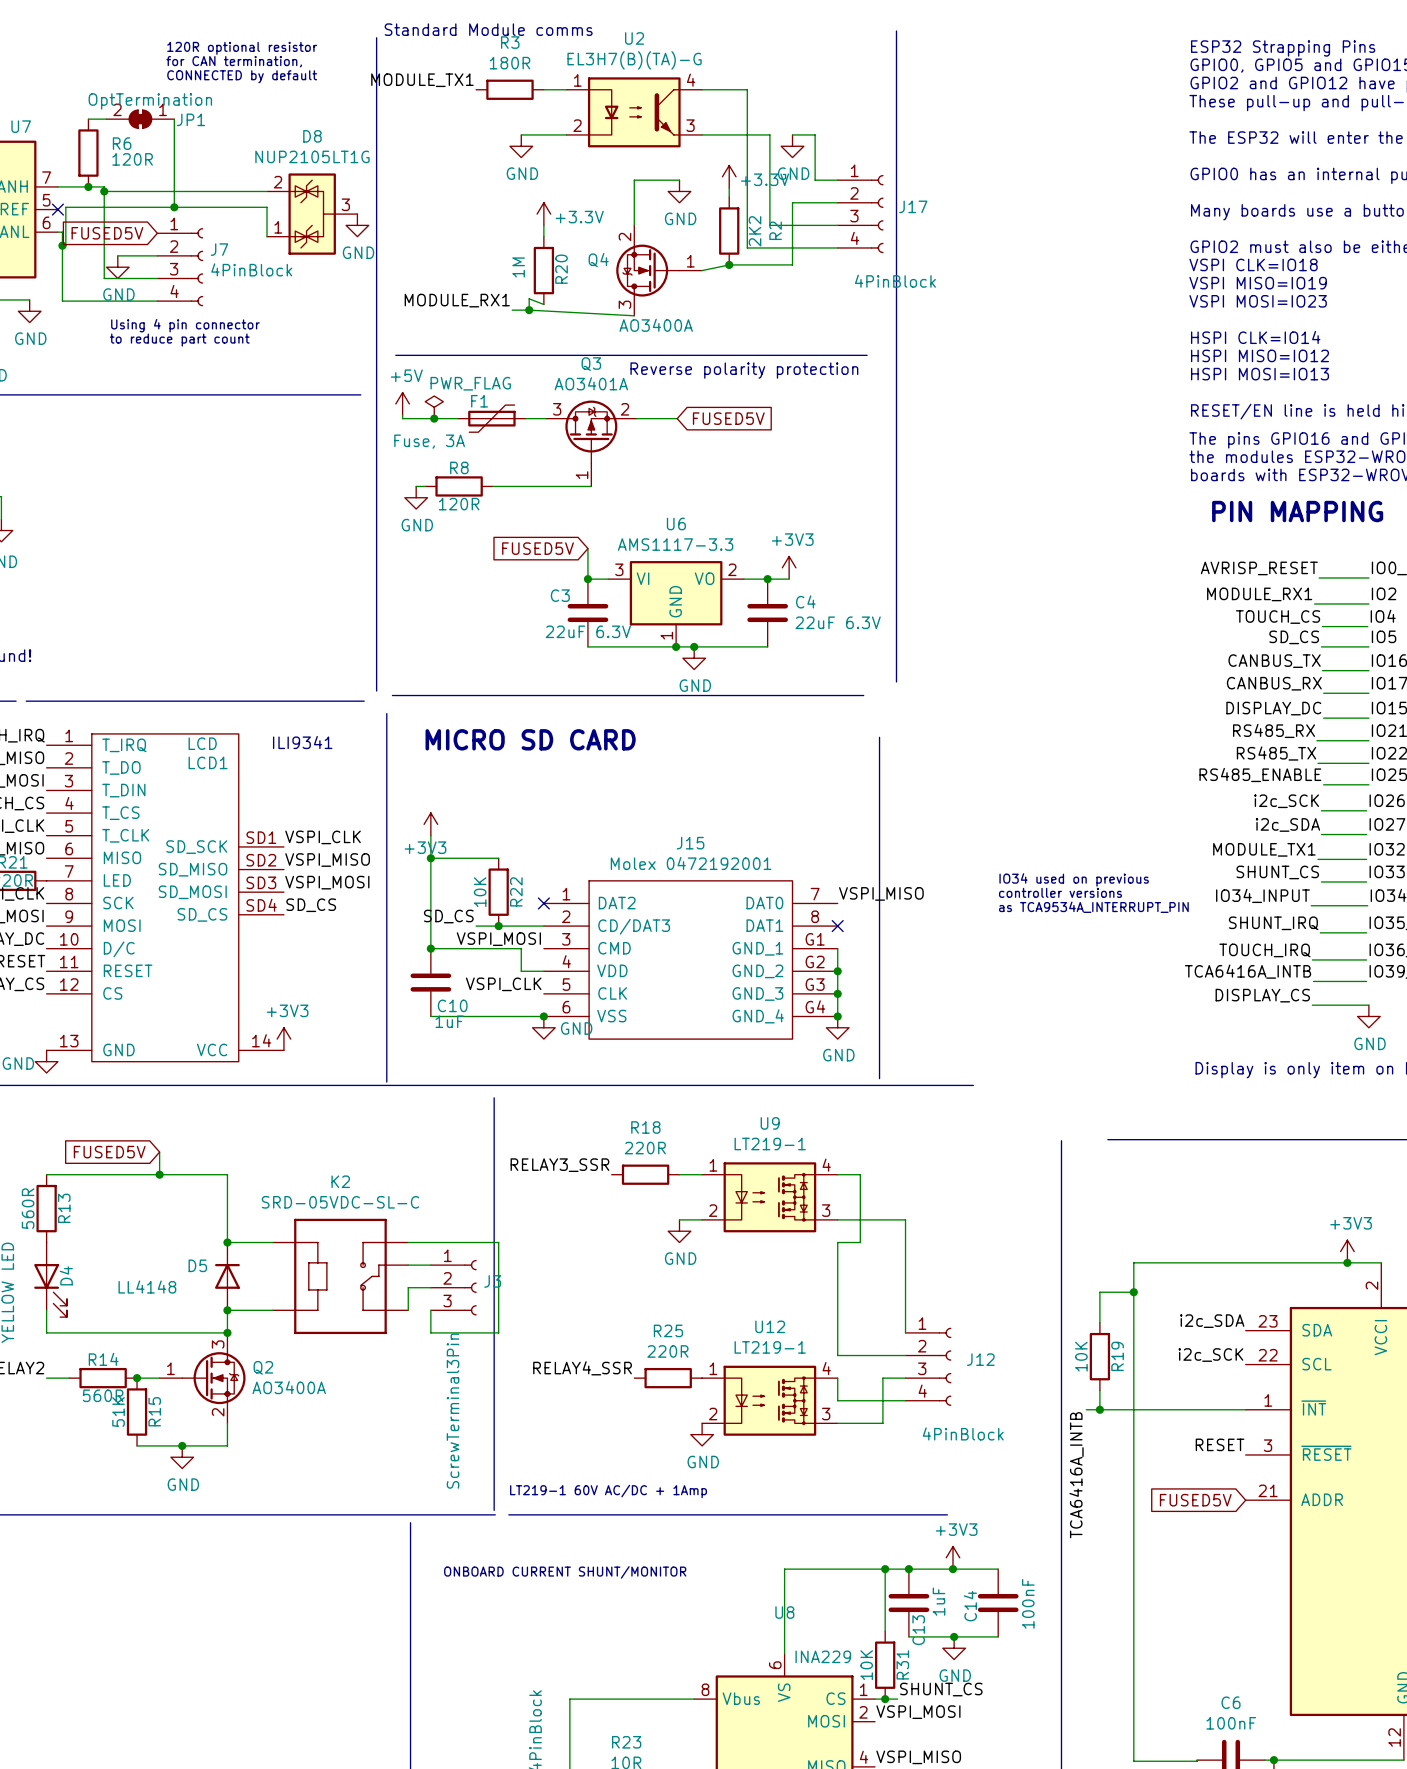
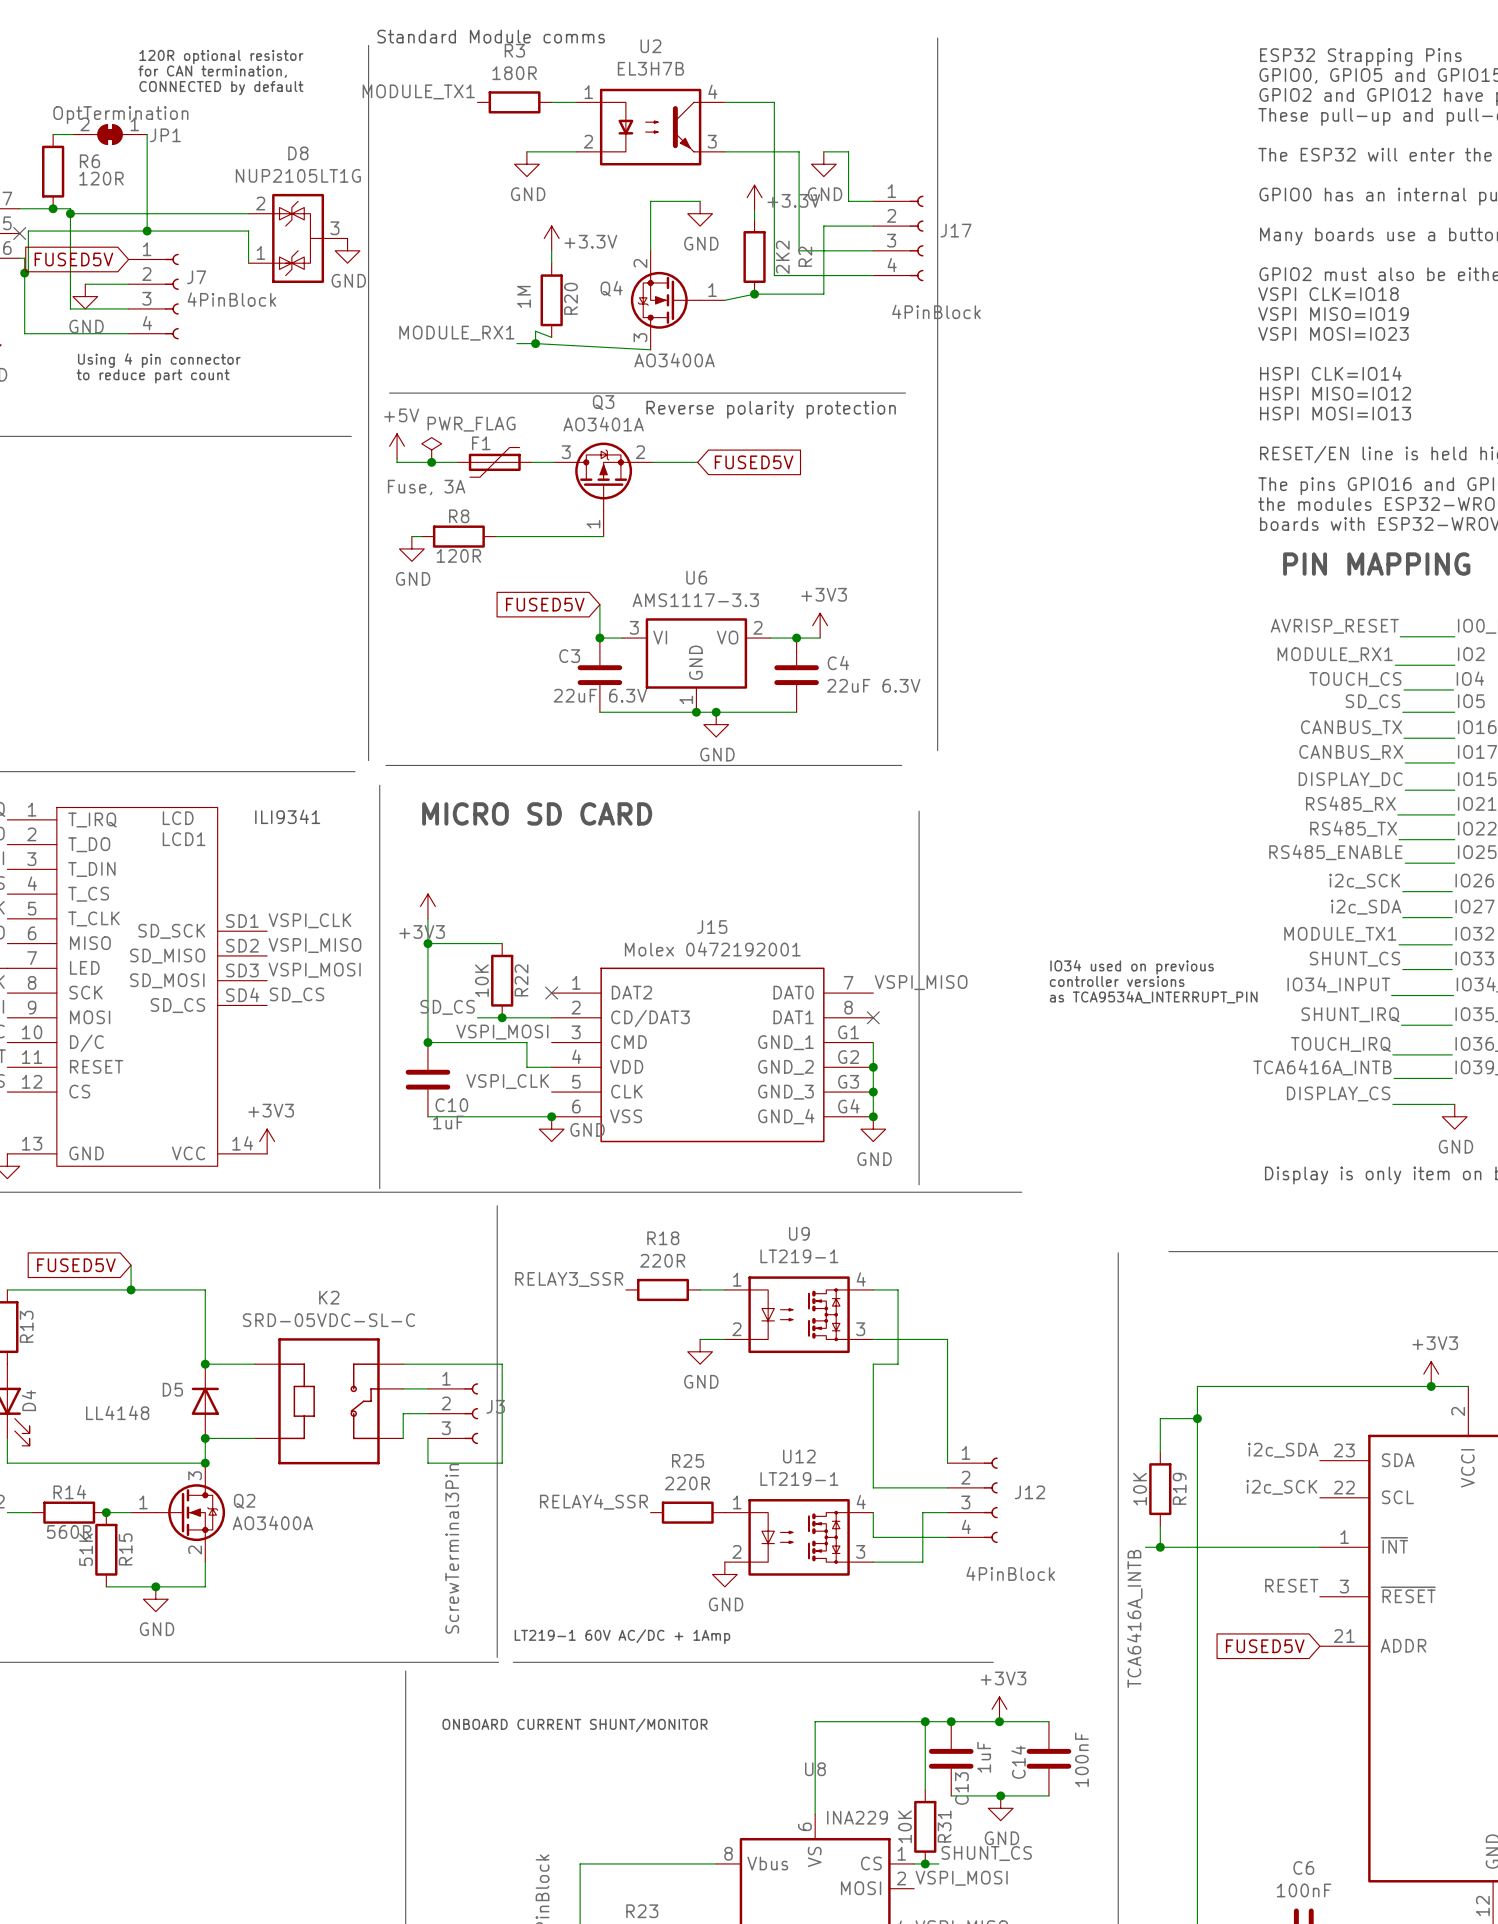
U2 value: EL3H7(B)(TA)-G (634, 60) -> EL3H7B (650, 68)

